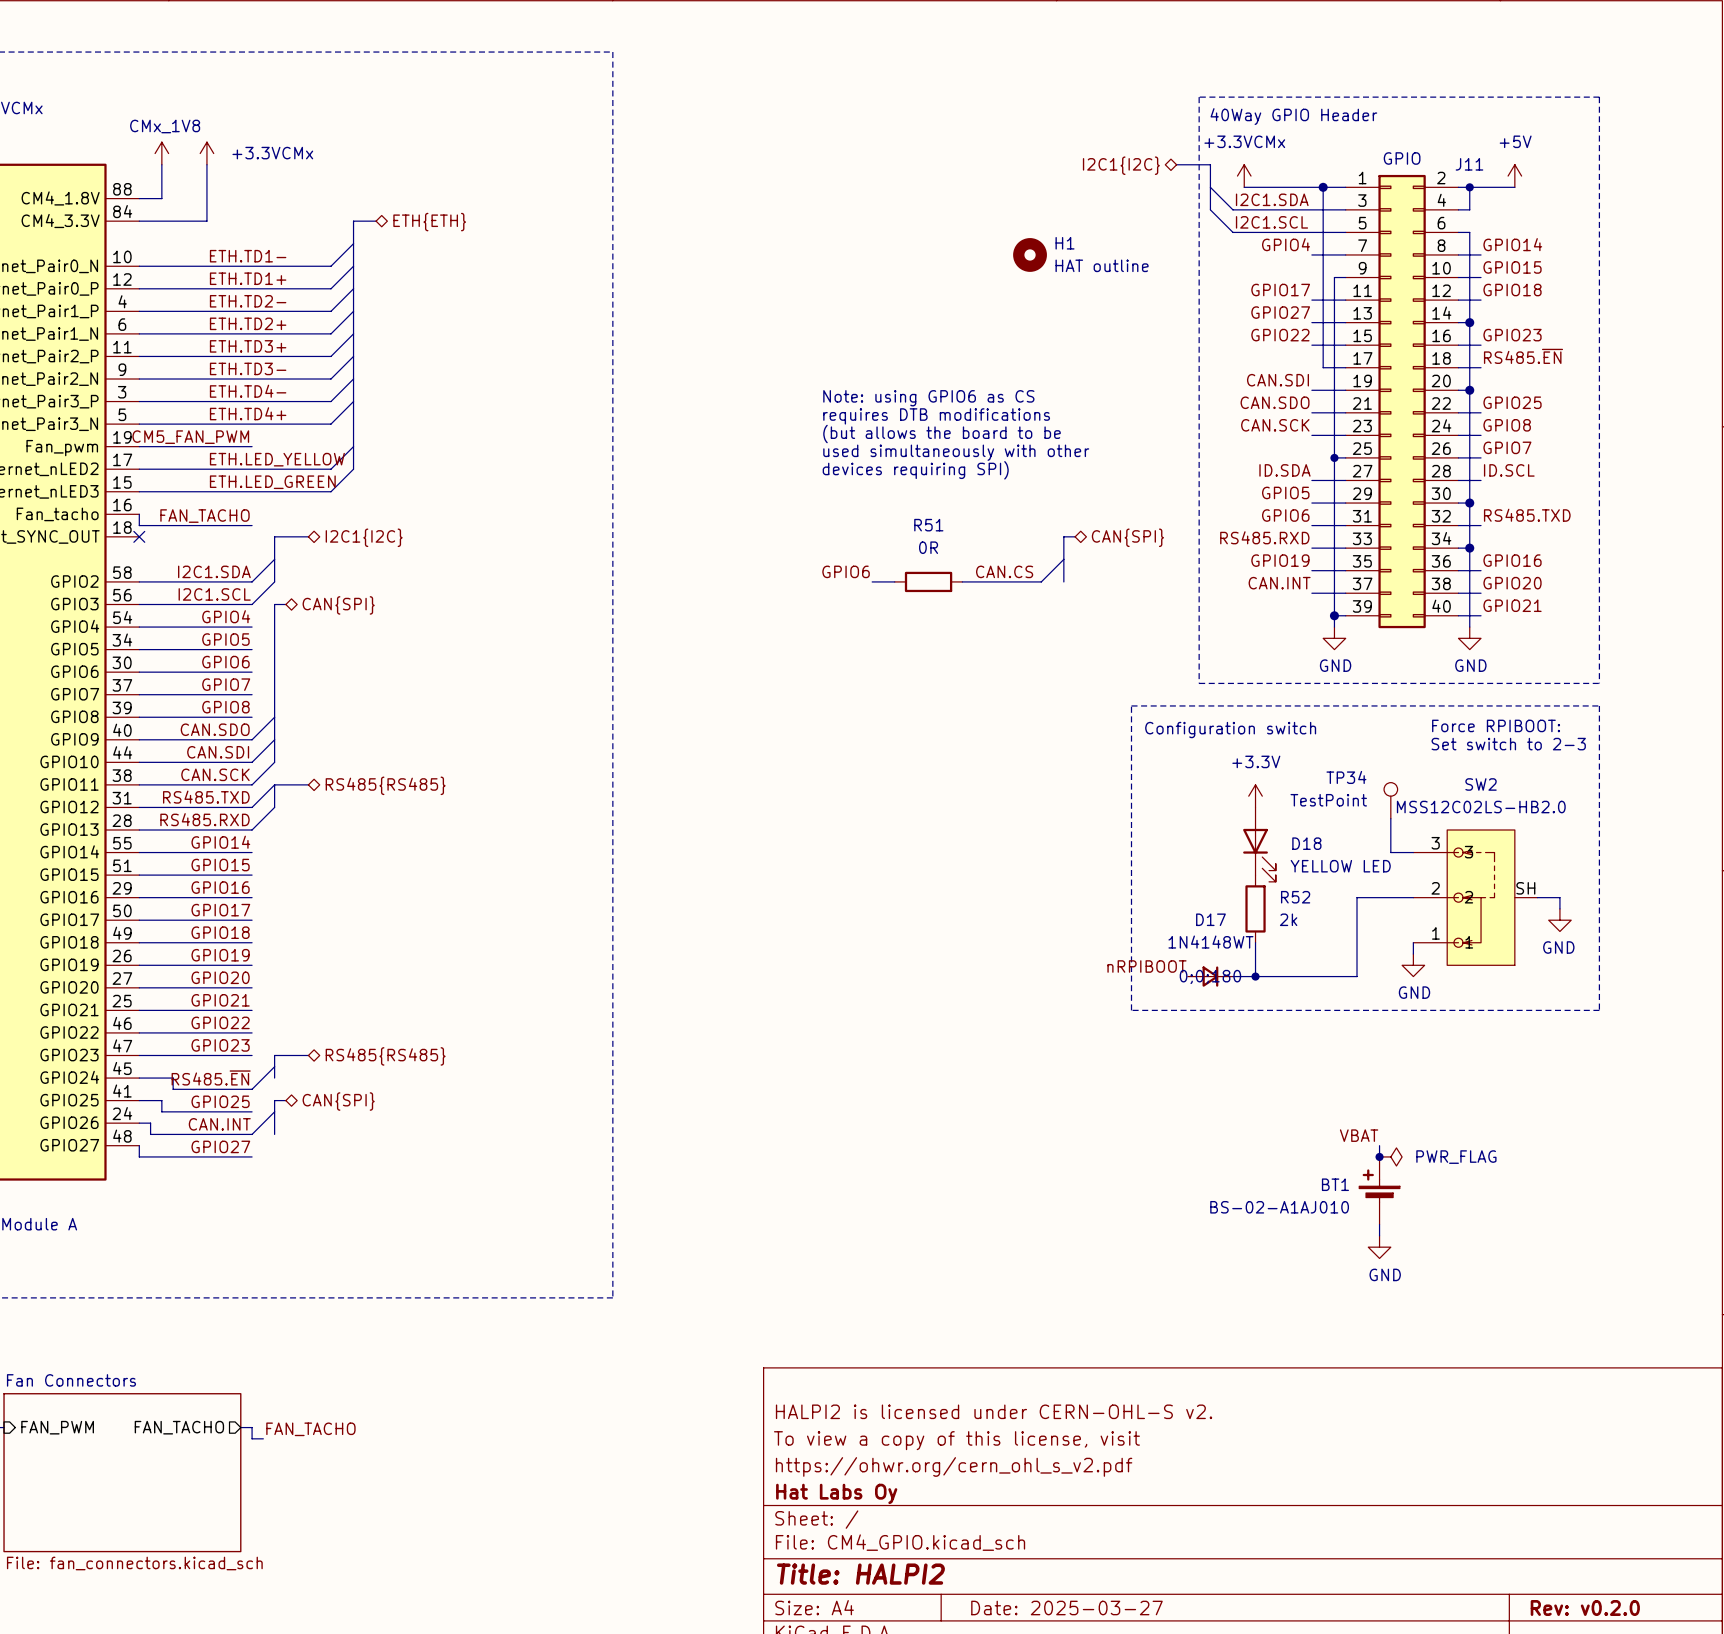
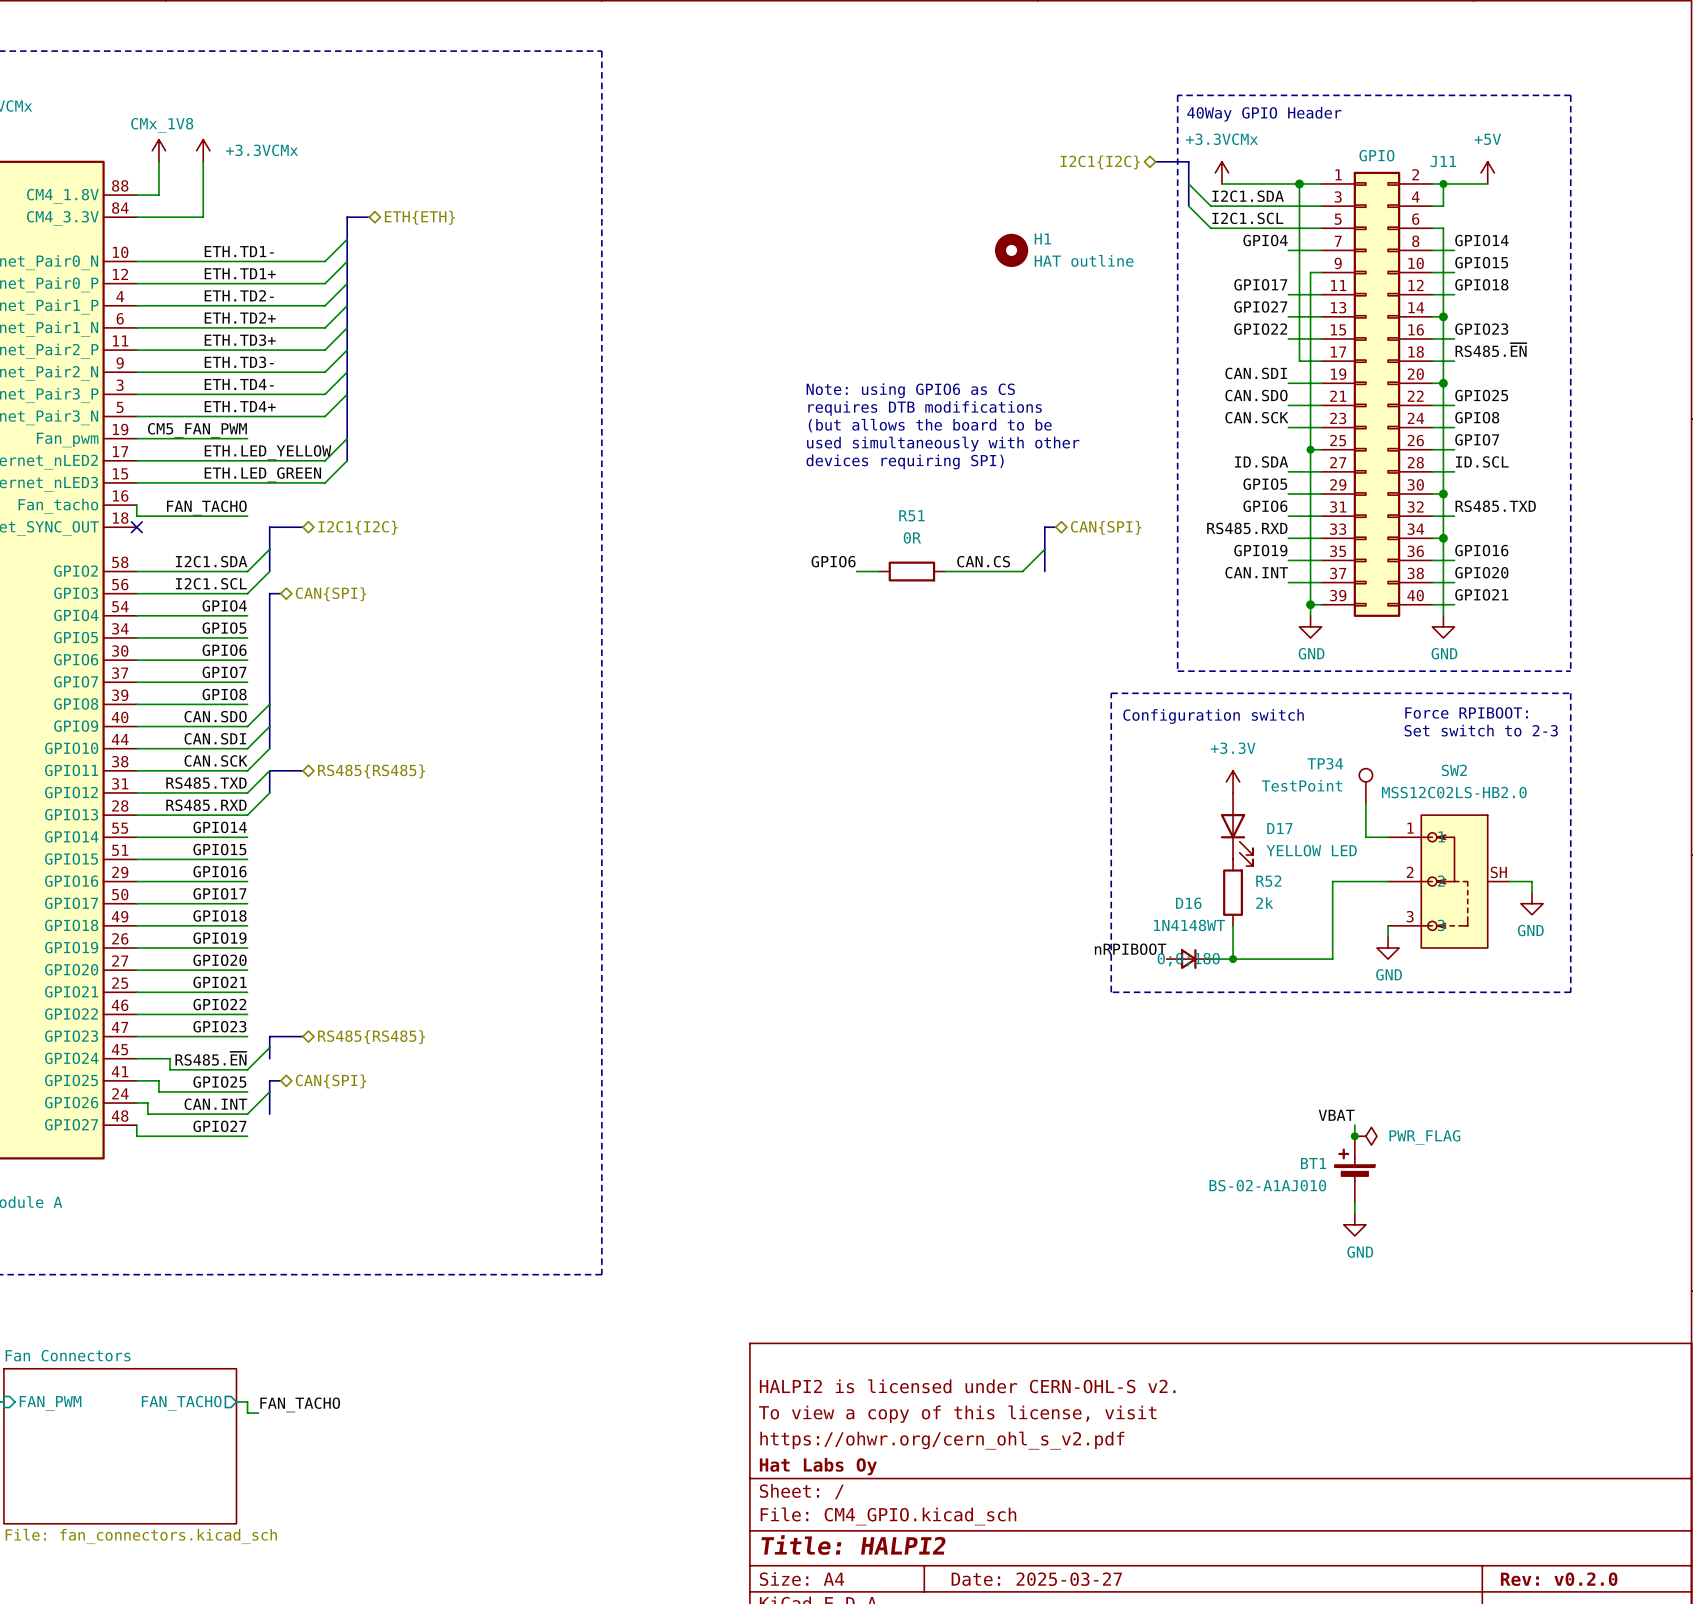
D18 name: D18 (1306, 843) -> D17 (1279, 828)
SW2 flip: as is (1481, 897) -> up-down (1454, 881)
D17 name: D17 (1210, 919) -> D16 (1188, 903)

